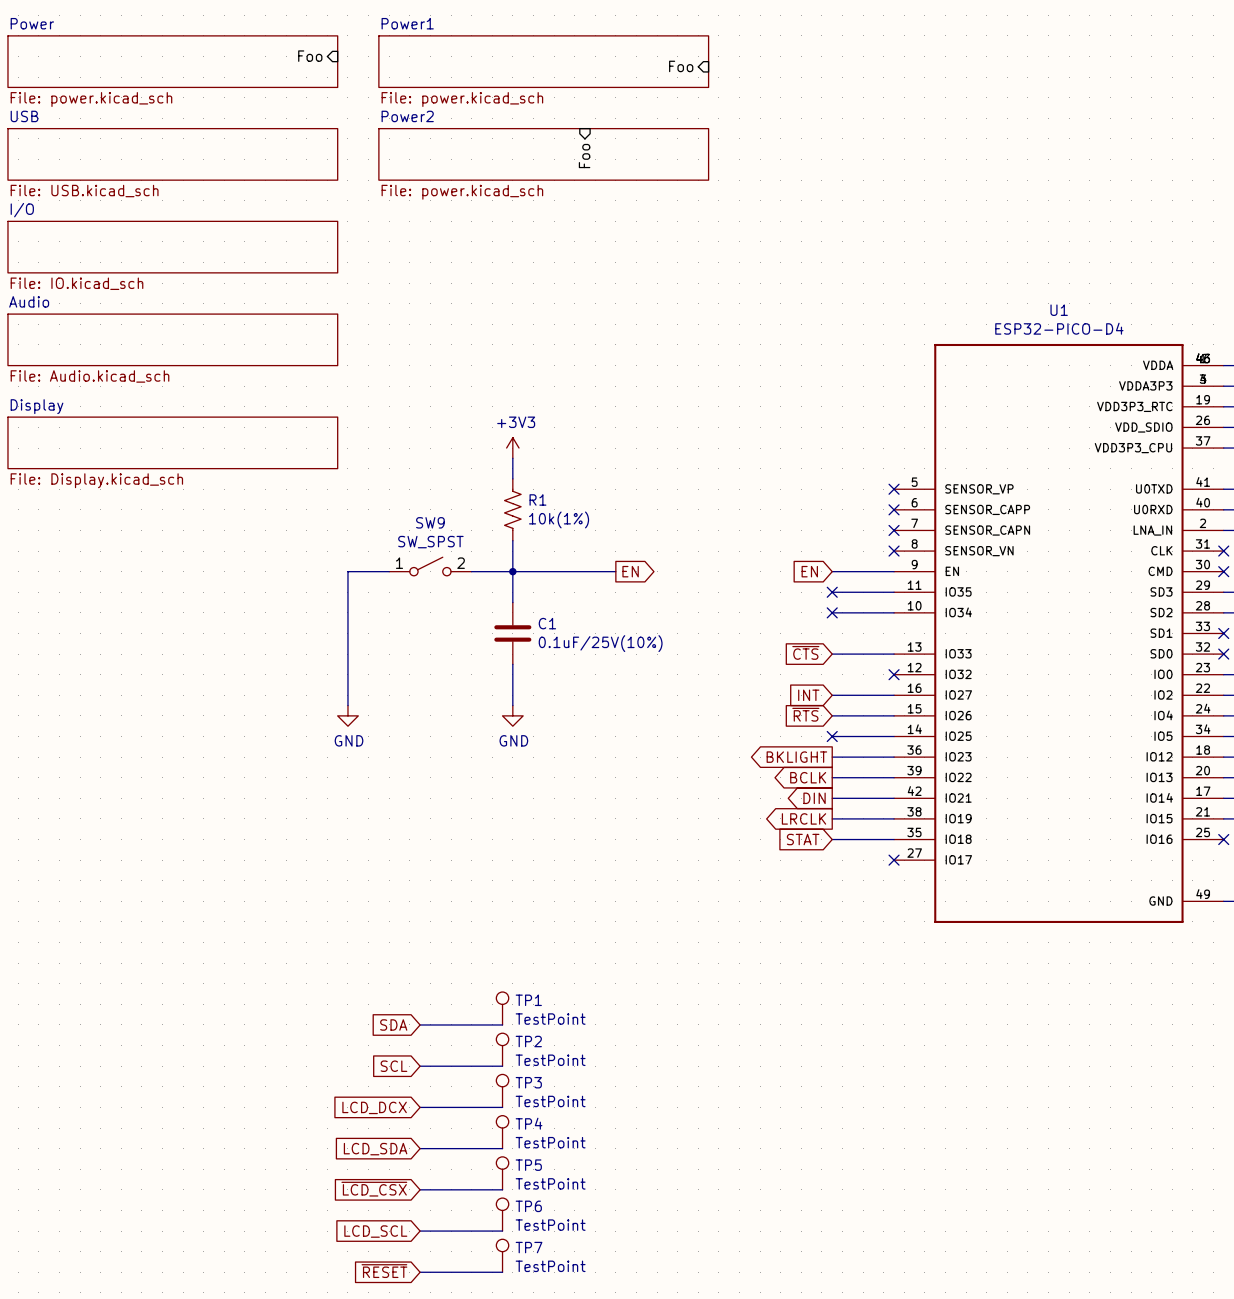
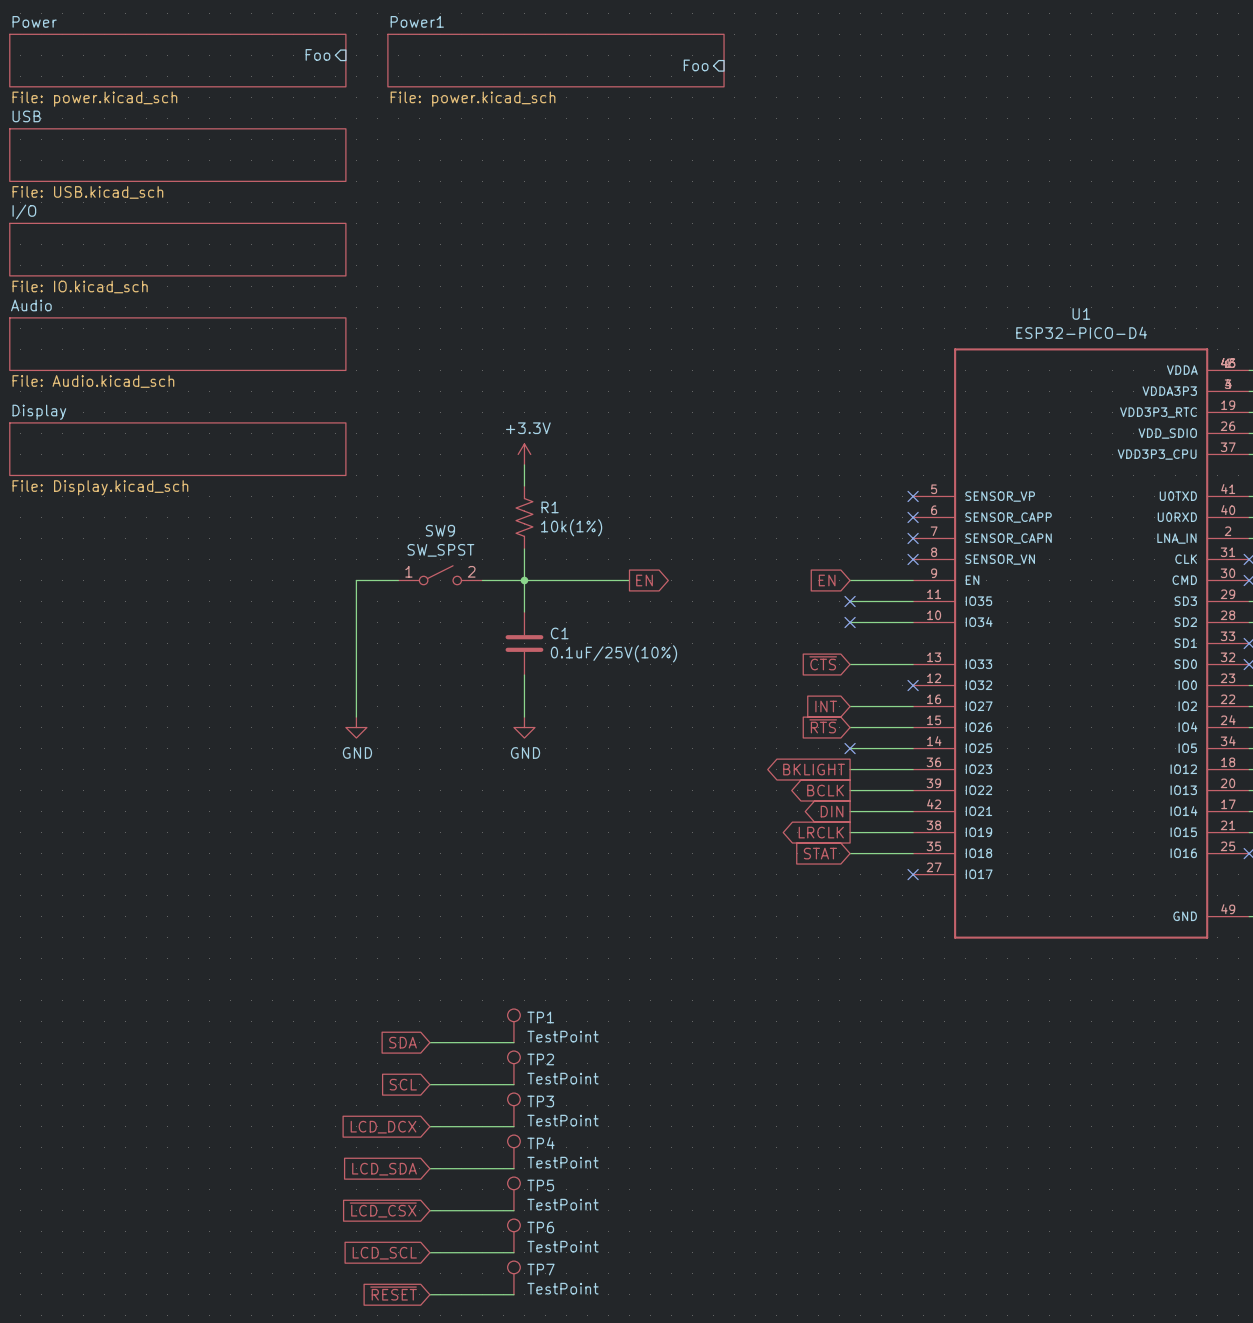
sheet Power2: File: power.kicad_sch (543, 154) -> none
sheet pin: Foo (584, 156) -> none
power symbol: +3V3 (512, 448) -> +3.3V (524, 454)

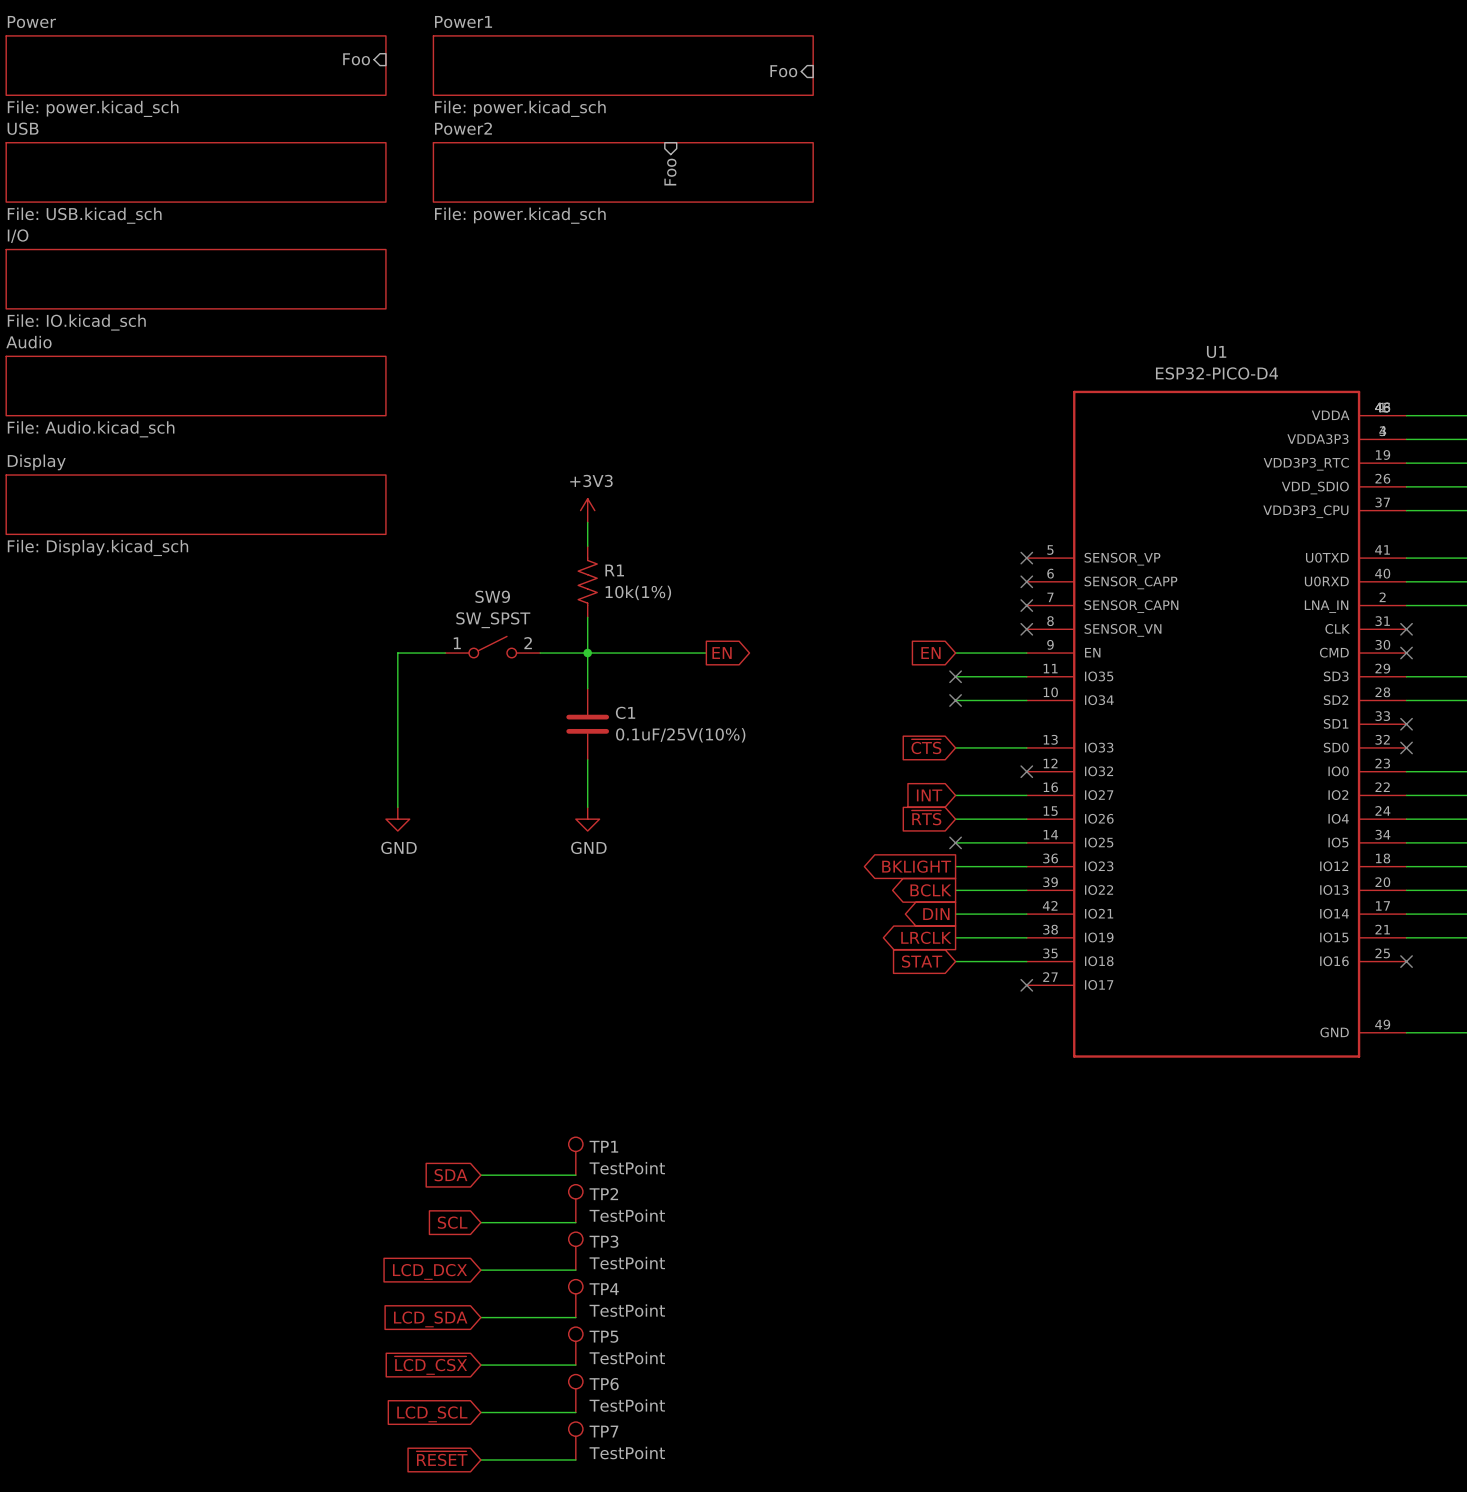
sheet Power2: none -> File: power.kicad_sch (623, 172)
sheet pin: none -> Foo (670, 172)
power symbol: +3.3V (524, 454) -> +3V3 (587, 510)

